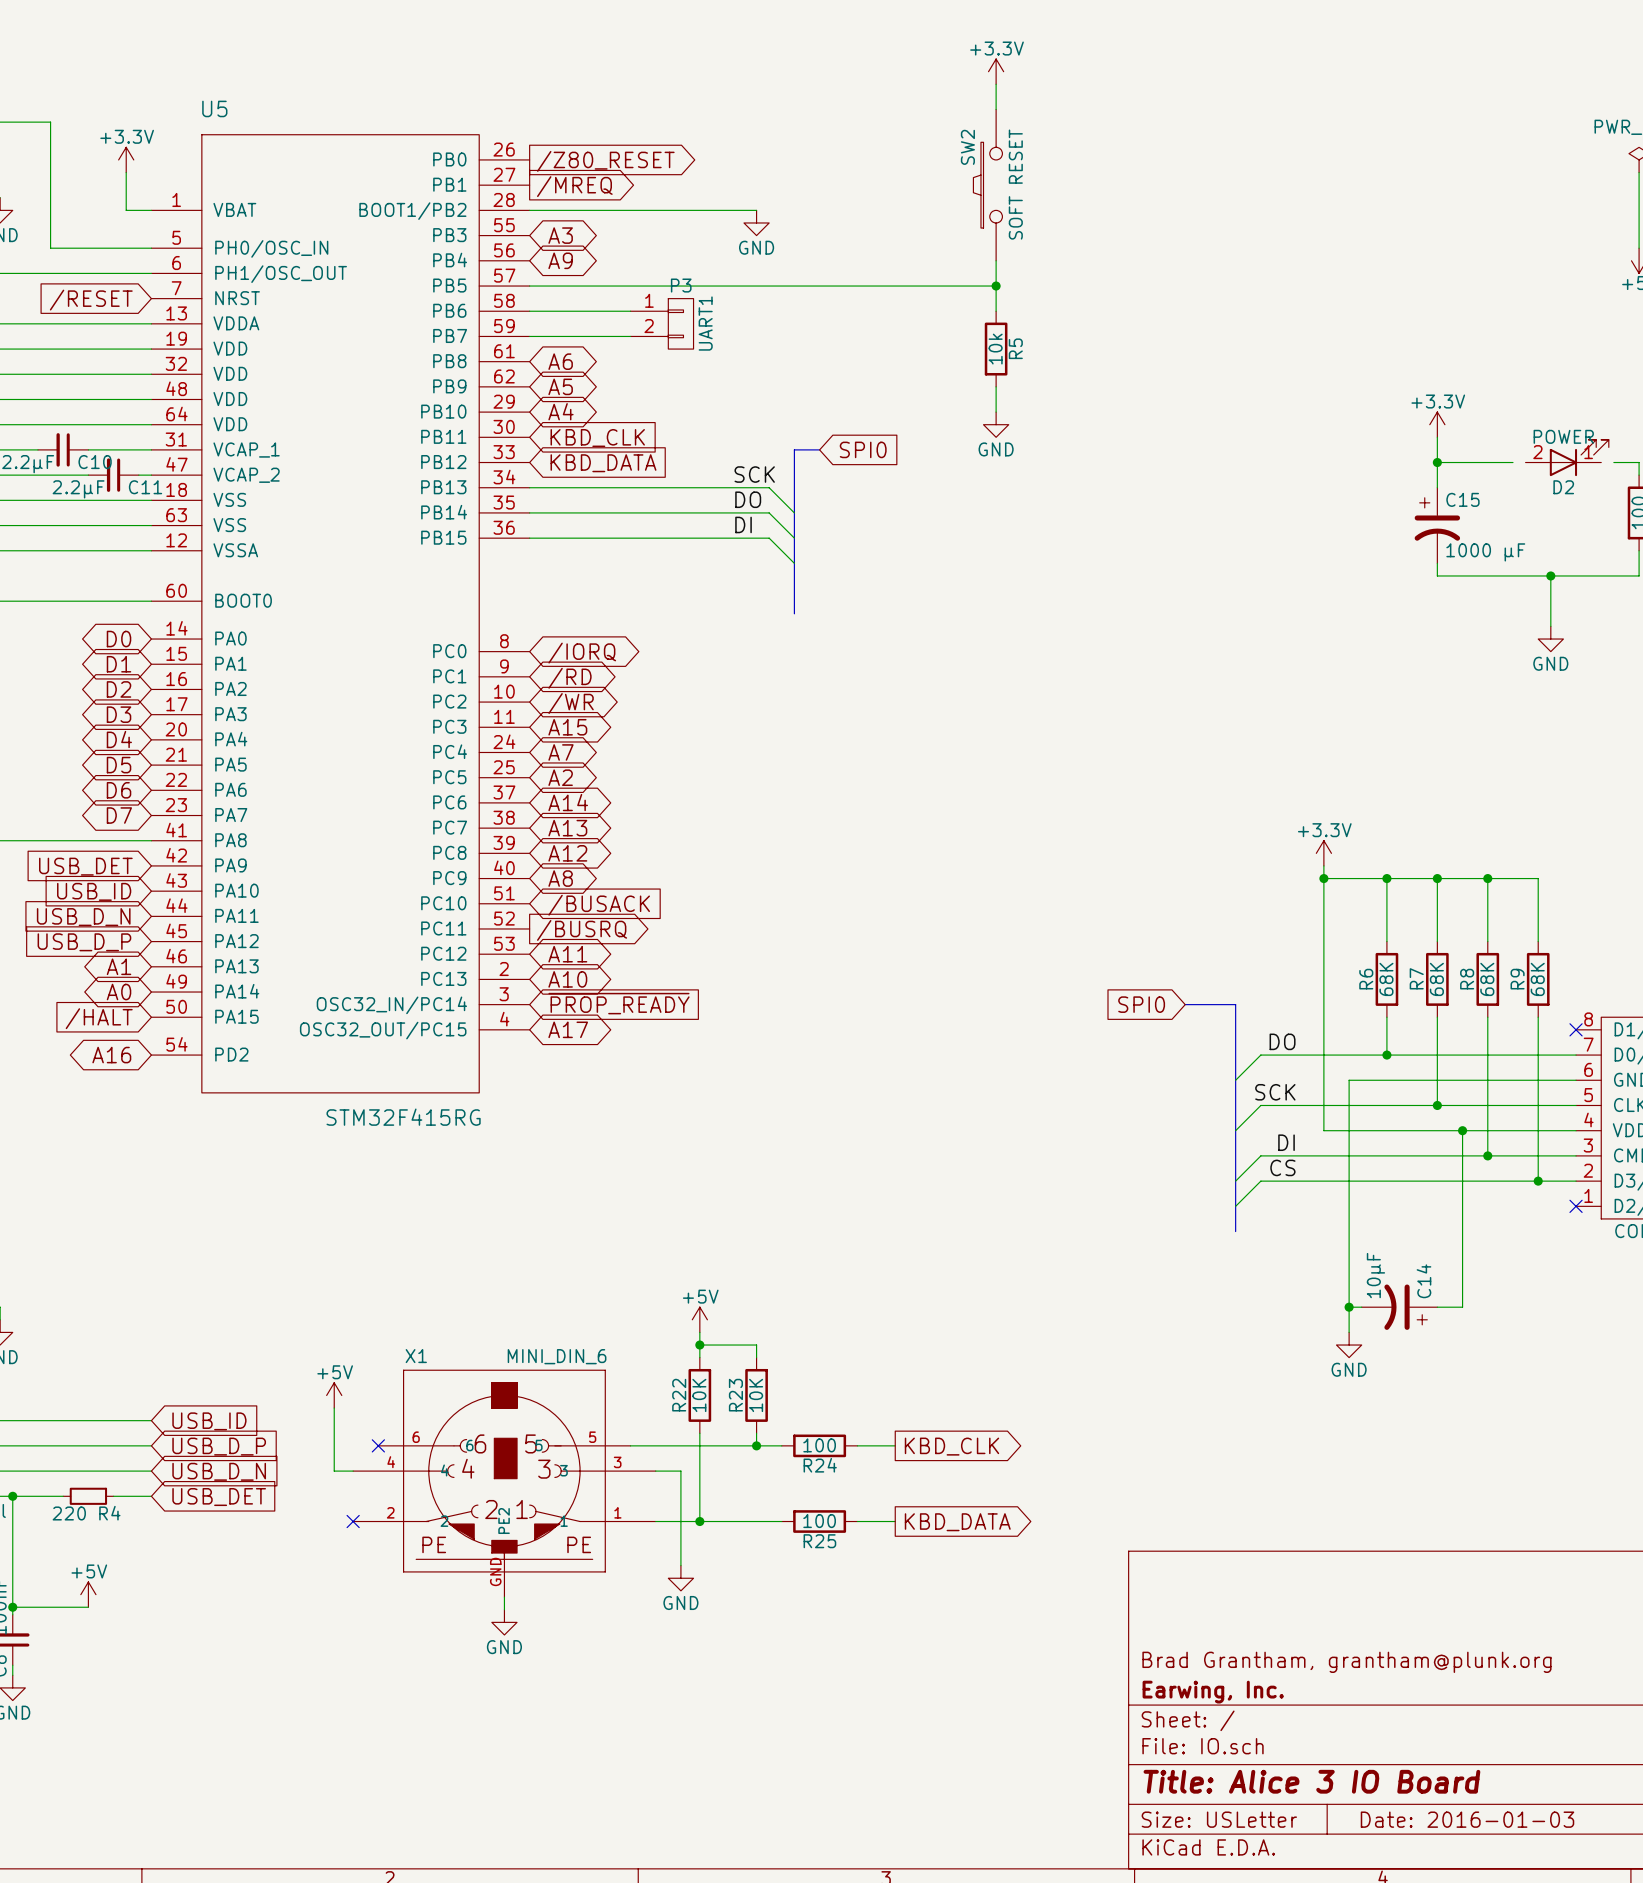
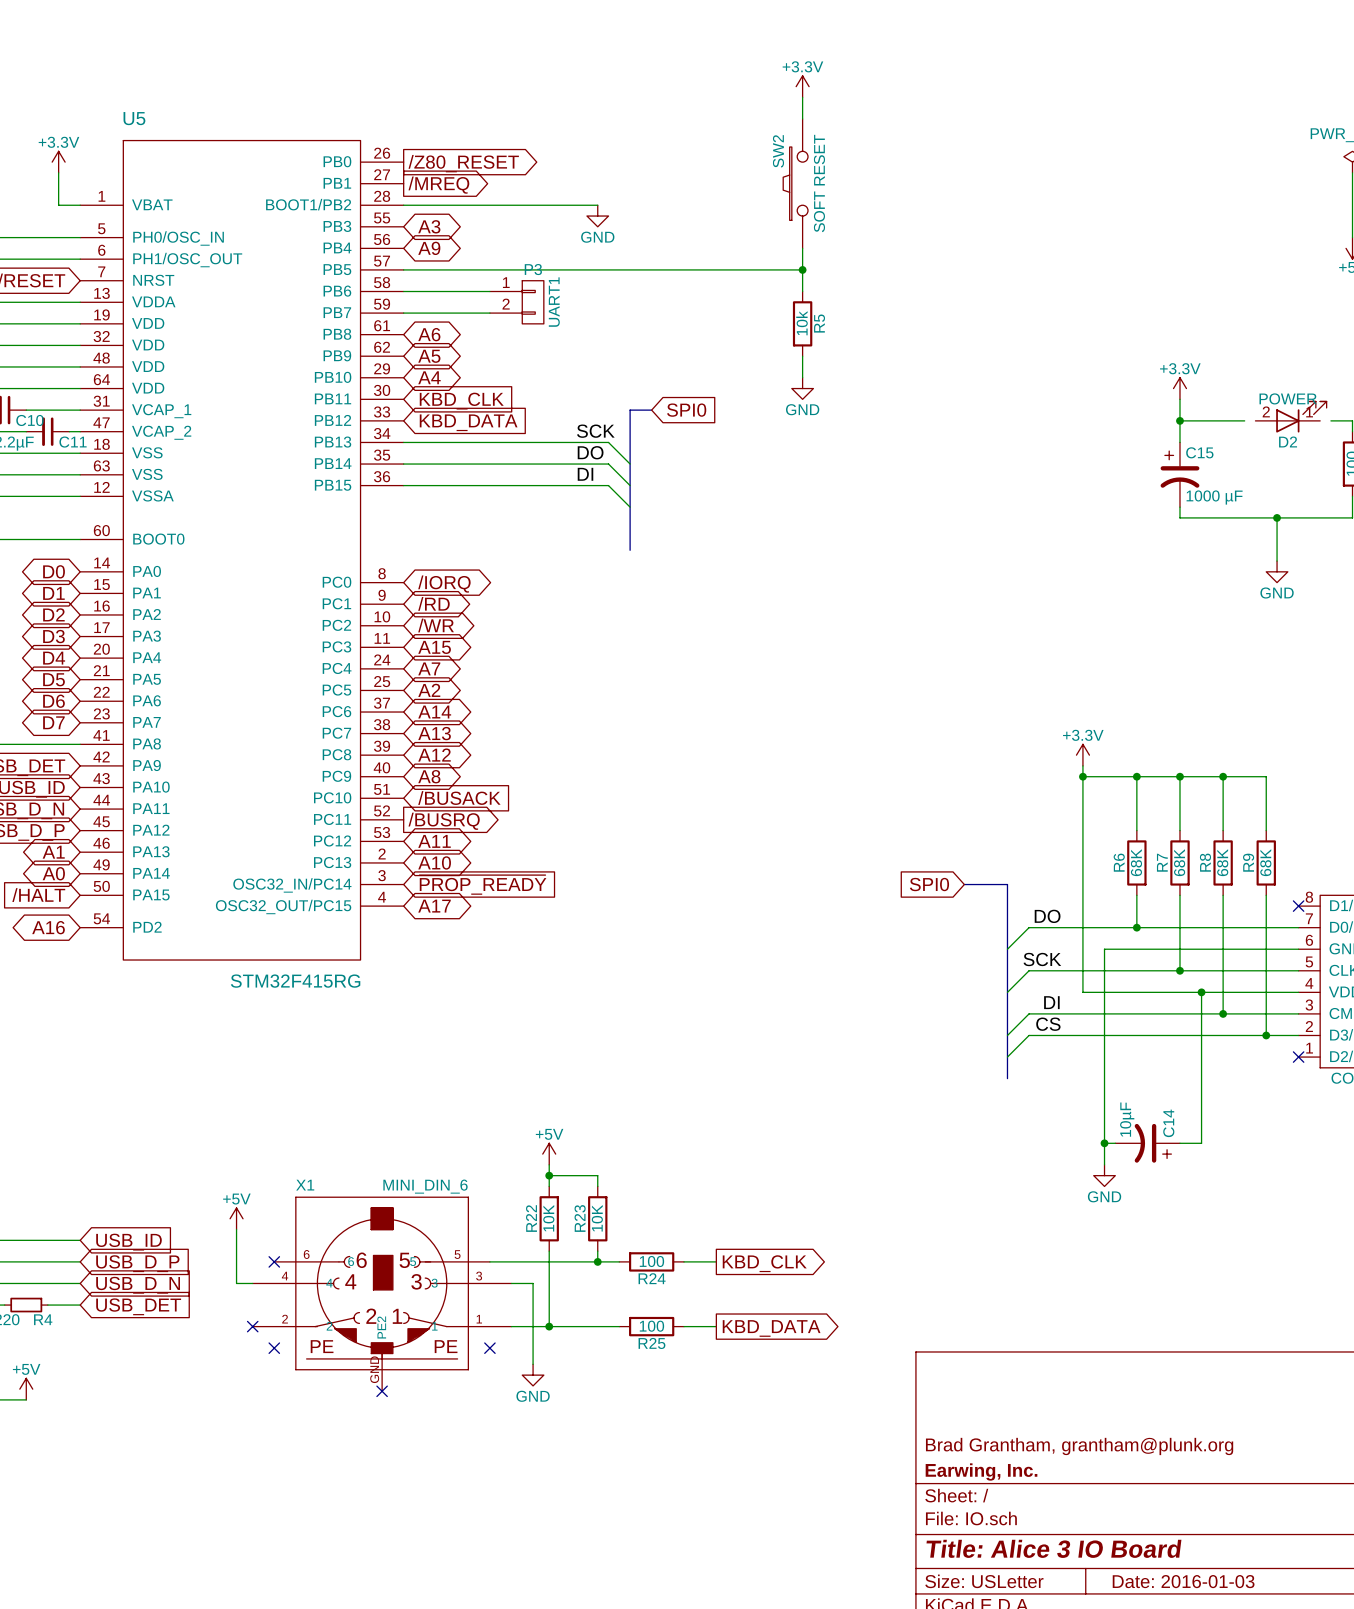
no-connect mark: none -> (274, 1348)
no-connect mark: none -> (489, 1348)
wire: (504, 1597) (504, 1609) -> none
no-connect mark: none -> (382, 1391)
power symbol: GND (504, 1622) -> none

